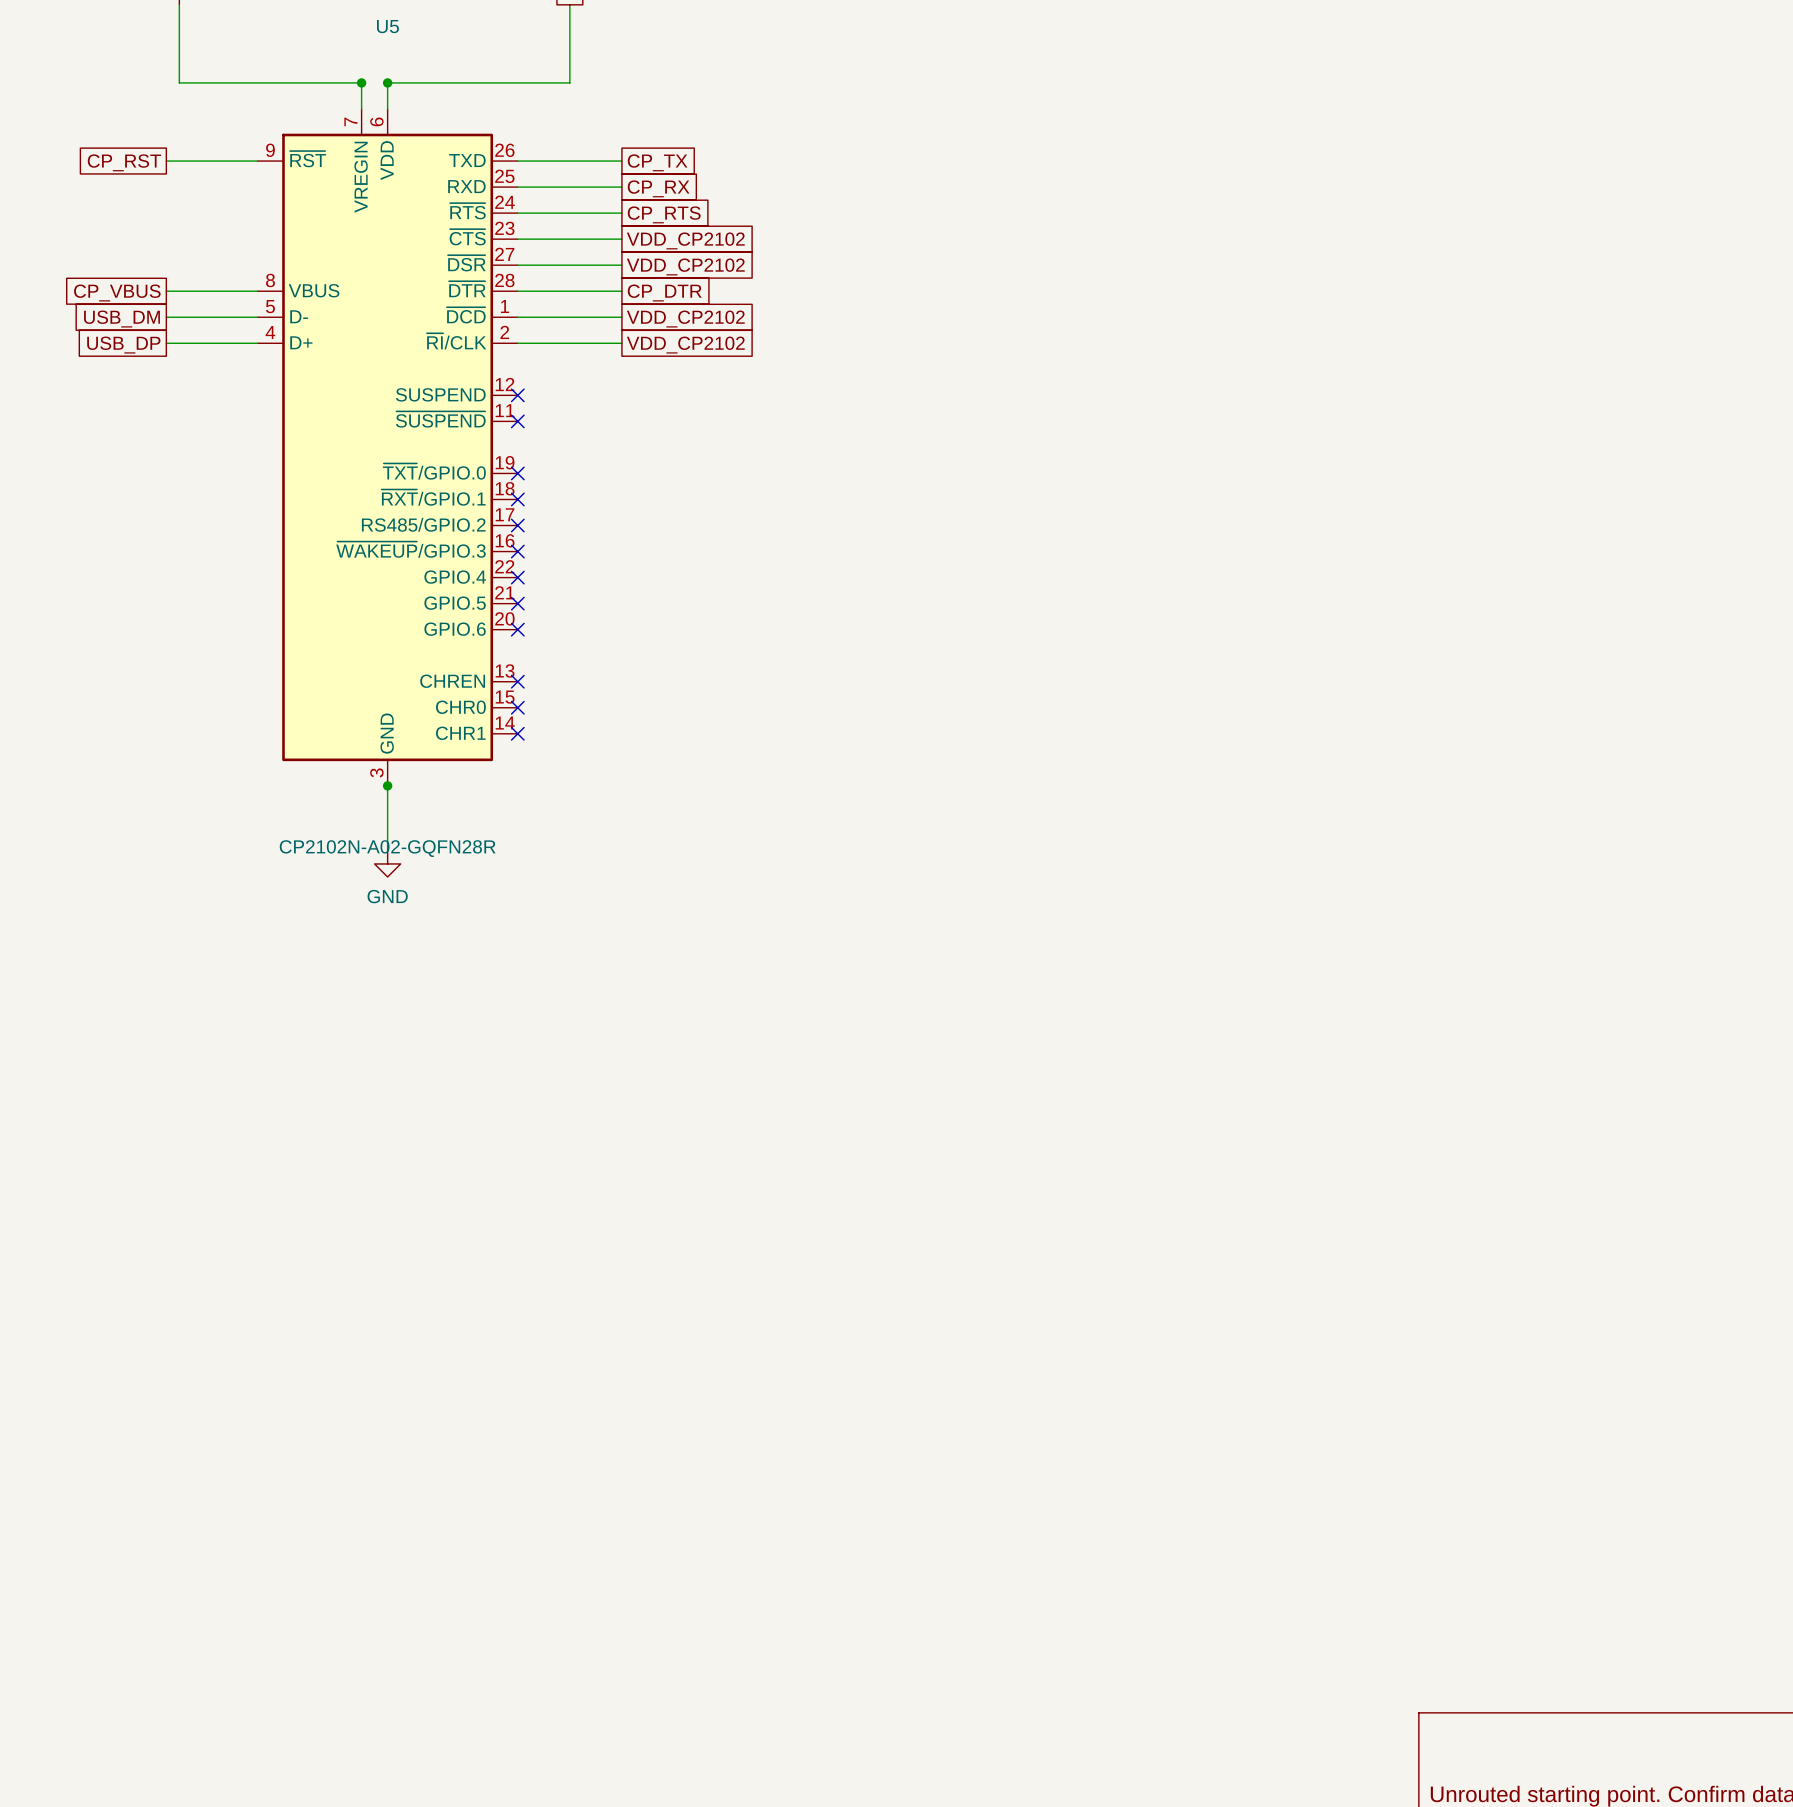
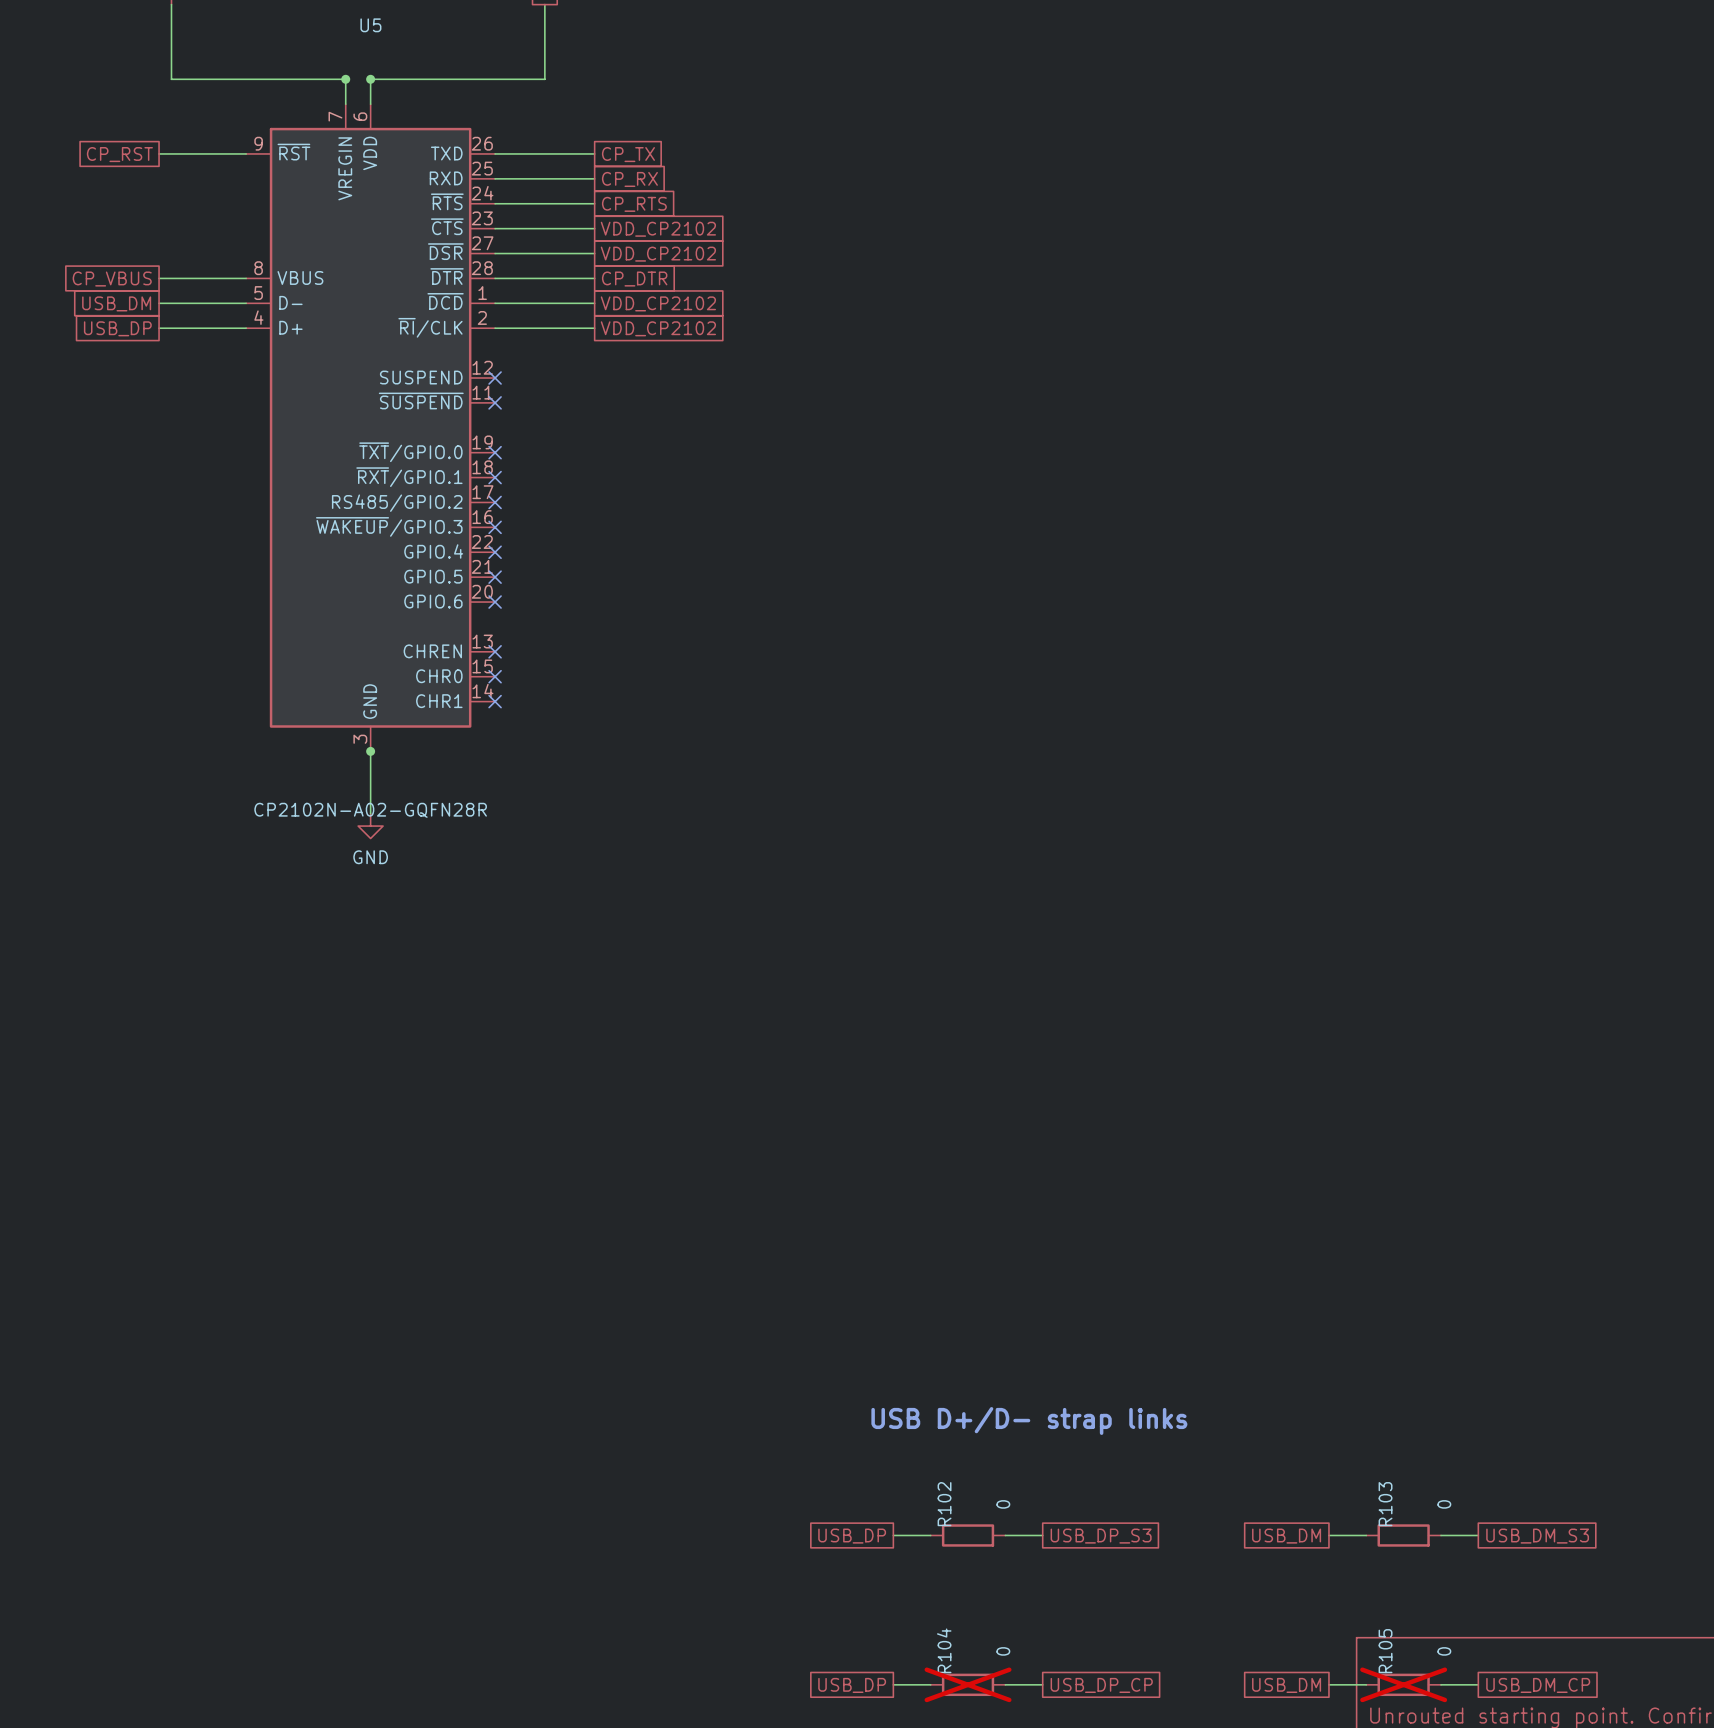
text: none -> USB D+/D- strap links (1029, 1420)
wire: none -> (893, 1535) (930, 1535)
R102: none -> 0 (968, 1535)
wire: none -> (1005, 1535) (1042, 1535)
wire: none -> (1328, 1535) (1366, 1535)
R103: none -> 0 (1403, 1535)
wire: none -> (1440, 1535) (1478, 1535)
global label: none -> USB_DP (852, 1536)
global label: none -> USB_DP_S3 (1101, 1536)
global label: none -> USB_DM (1286, 1536)
global label: none -> USB_DM_S3 (1537, 1536)
wire: none -> (893, 1684) (930, 1684)
R104: none -> 0 (968, 1684)
wire: none -> (1005, 1684) (1042, 1684)
wire: none -> (1328, 1684) (1366, 1684)
R105: none -> 0 (1403, 1684)
wire: none -> (1440, 1684) (1478, 1684)
global label: none -> USB_DP (852, 1685)
global label: none -> USB_DP_CP (1101, 1685)
global label: none -> USB_DM (1286, 1685)
global label: none -> USB_DM_CP (1538, 1685)

